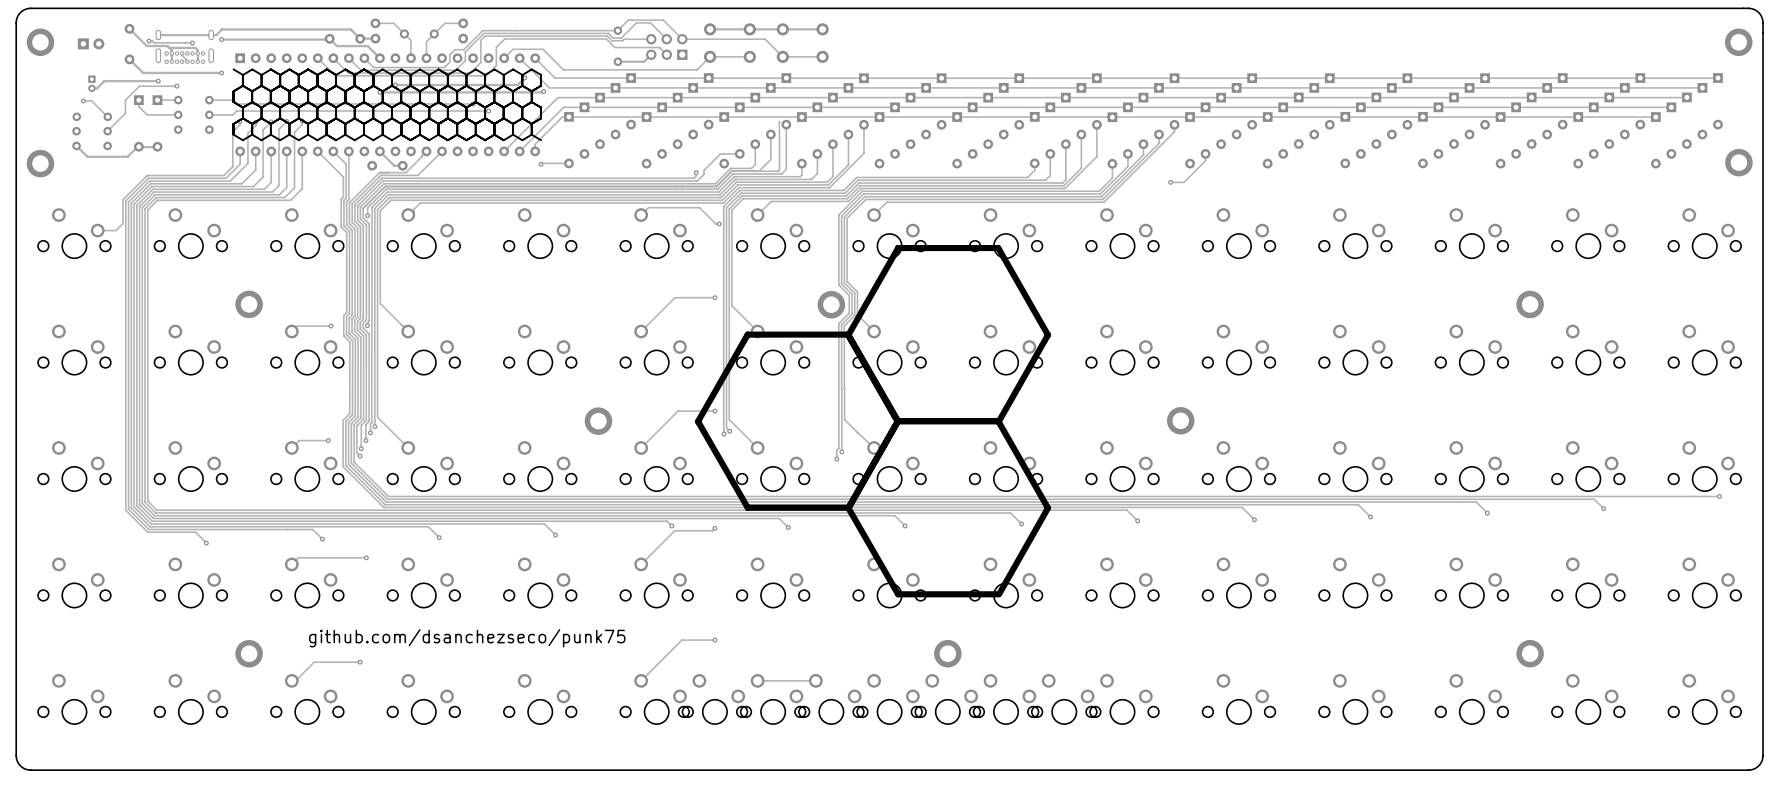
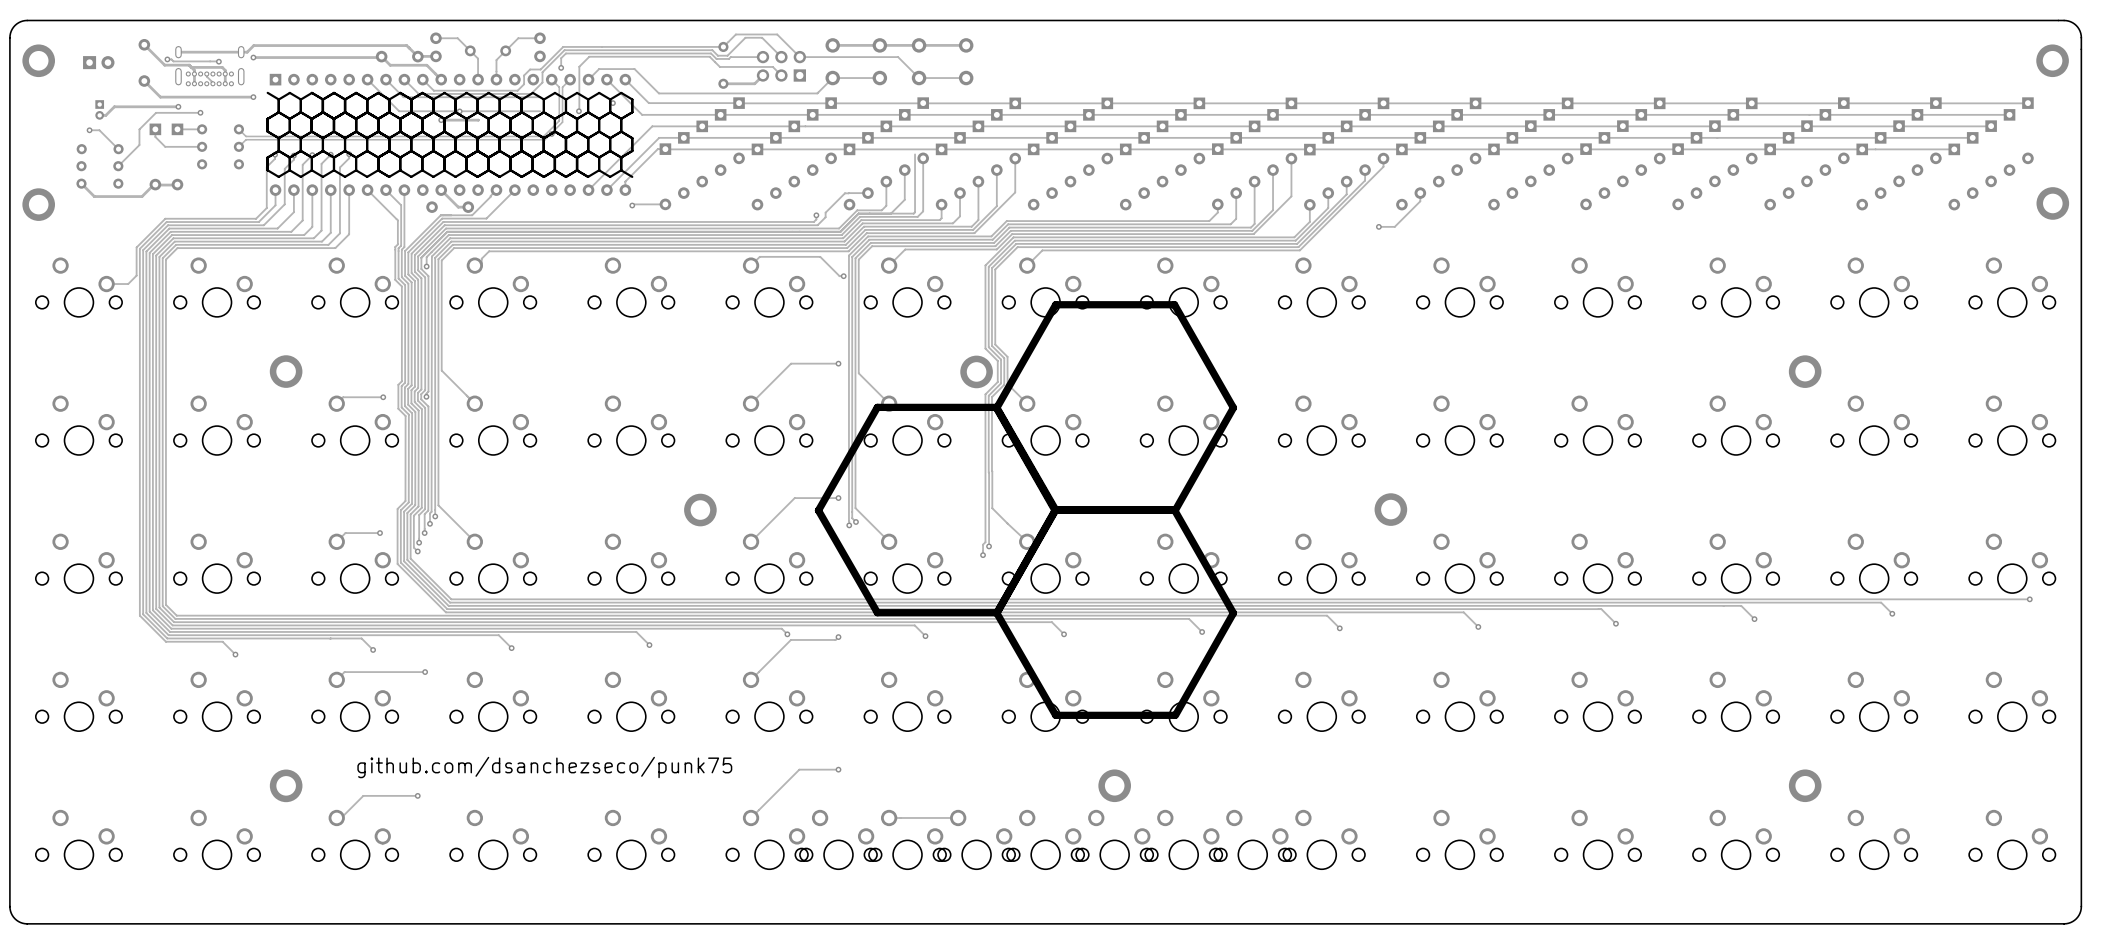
track: (481, 40) (480, 62) (470, 73) (463, 73) -> (561, 58) (561, 67)
via: none -> (561, 67)
track: (496, 65) (486, 75) (335, 75) -> (540, 111) (399, 111) (388, 100)
track: none -> (579, 88) (578, 111)
track: (524, 78) (517, 85) (395, 85) -> none
via: none -> (578, 111)
track: (543, 91) (411, 92) -> none
via: (543, 91) -> none
track: (209, 100) (233, 100) (237, 104) (473, 104) -> (238, 129) (246, 136) (543, 136) (559, 120) (559, 87) (551, 79)
track: (488, 111) (236, 111) (232, 114) (209, 114) -> (570, 79) (562, 87) (562, 122) (545, 139) (246, 139) (238, 146)
via: (488, 111) -> none

